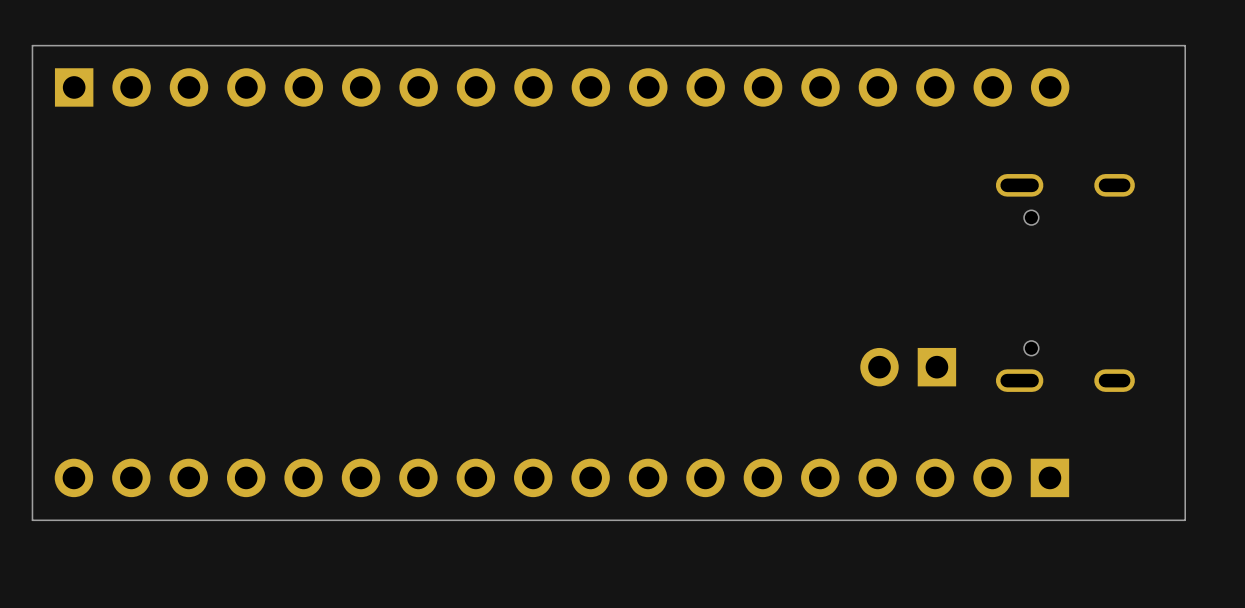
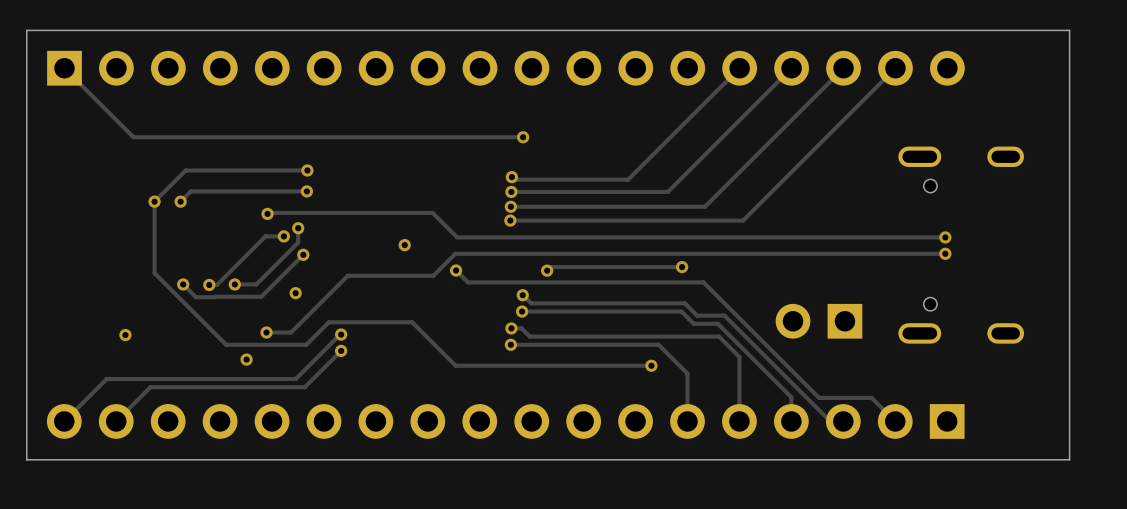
track: none -> (64, 68) (133, 137) (523, 137)
track: none -> (739, 68) (628, 179) (514, 179) (511, 177)
track: none -> (791, 68) (667, 191) (511, 191)
track: none -> (843, 68) (705, 206) (510, 206)
track: none -> (895, 68) (743, 220) (510, 220)
via: none -> (523, 137)
track: none -> (307, 170) (185, 170) (154, 201) (154, 273) (226, 344) (306, 344) (328, 322) (412, 322) (455, 365) (651, 365)
via: none -> (307, 170)
via: none -> (511, 177)
track: none -> (306, 191) (190, 191) (180, 201)
via: none -> (306, 191)
via: none -> (511, 191)
via: none -> (154, 201)
via: none -> (180, 201)
via: none -> (510, 206)
track: none -> (267, 213) (432, 212) (457, 237) (945, 237)
via: none -> (267, 213)
via: none -> (510, 220)
track: none -> (298, 228) (298, 242) (256, 284) (234, 284)
via: none -> (298, 228)
track: none -> (283, 236) (265, 236) (216, 284) (209, 284)
via: none -> (283, 236)
via: none -> (945, 237)
via: none -> (404, 245)
track: none -> (945, 253) (455, 253) (433, 275) (347, 275) (291, 332) (266, 332)
via: none -> (945, 253)
track: none -> (303, 254) (261, 296) (195, 297) (183, 284)
via: none -> (303, 254)
track: none -> (682, 267) (550, 267) (547, 270)
via: none -> (682, 267)
track: none -> (456, 270) (468, 282) (703, 282) (819, 397) (871, 397) (895, 421)
via: none -> (456, 270)
via: none -> (547, 270)
via: none -> (183, 284)
via: none -> (234, 284)
via: none -> (209, 284)
via: none -> (295, 293)
via: none -> (522, 295)
track: none -> (523, 295) (531, 303) (684, 303) (697, 315) (724, 315) (830, 421) (843, 421)
track: none -> (522, 311) (681, 311) (693, 323) (717, 323) (791, 397) (791, 421)
via: none -> (522, 311)
track: none -> (511, 328) (521, 328) (529, 336) (719, 336) (739, 356) (739, 421)
via: none -> (511, 328)
via: none -> (266, 332)
track: none -> (341, 334) (295, 379) (106, 379) (64, 421)
via: none -> (341, 334)
via: none -> (125, 335)
track: none -> (510, 344) (658, 344) (687, 373) (687, 421)
via: none -> (510, 344)
track: none -> (341, 350) (304, 387) (150, 387) (116, 421)
via: none -> (341, 350)
via: none -> (246, 359)
via: none -> (651, 365)

